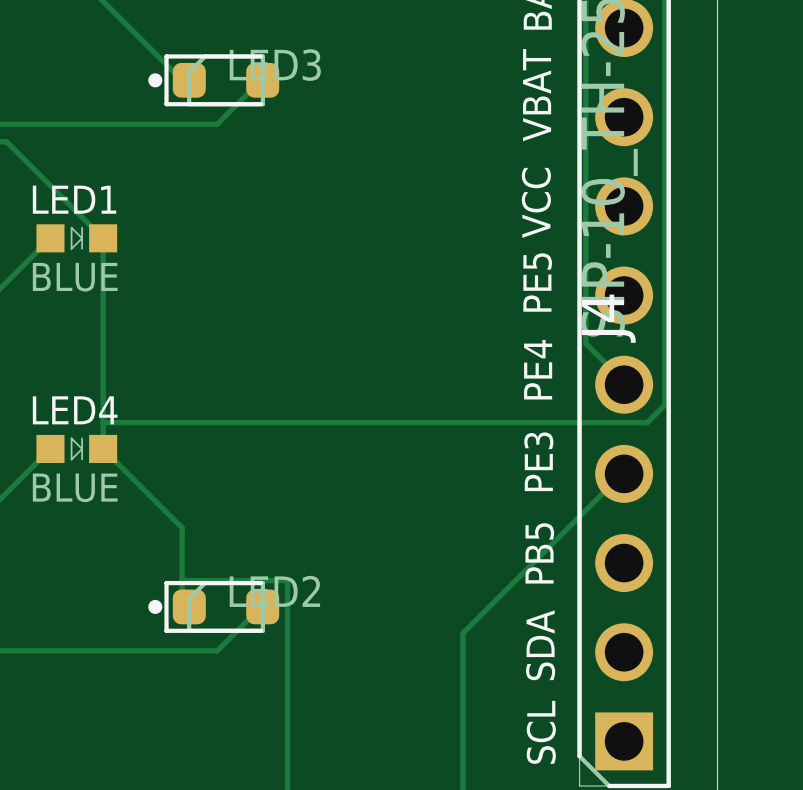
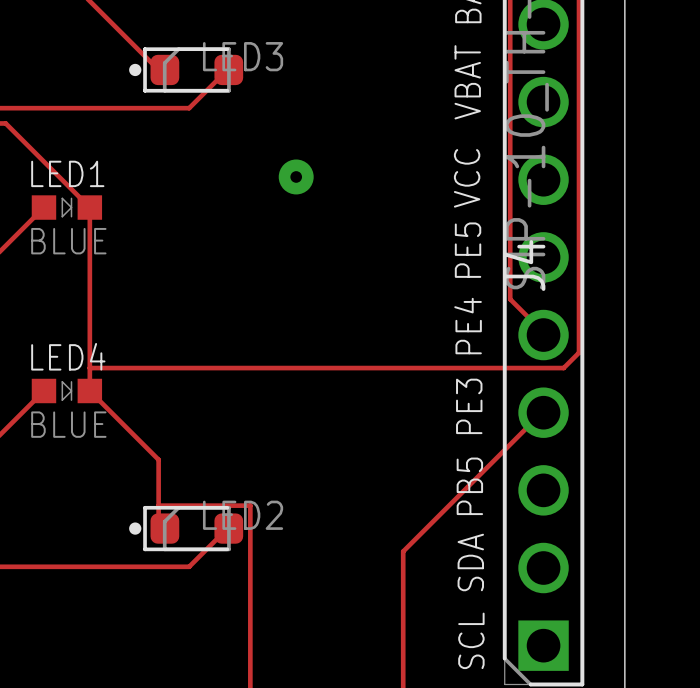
via: none -> (296, 176)

